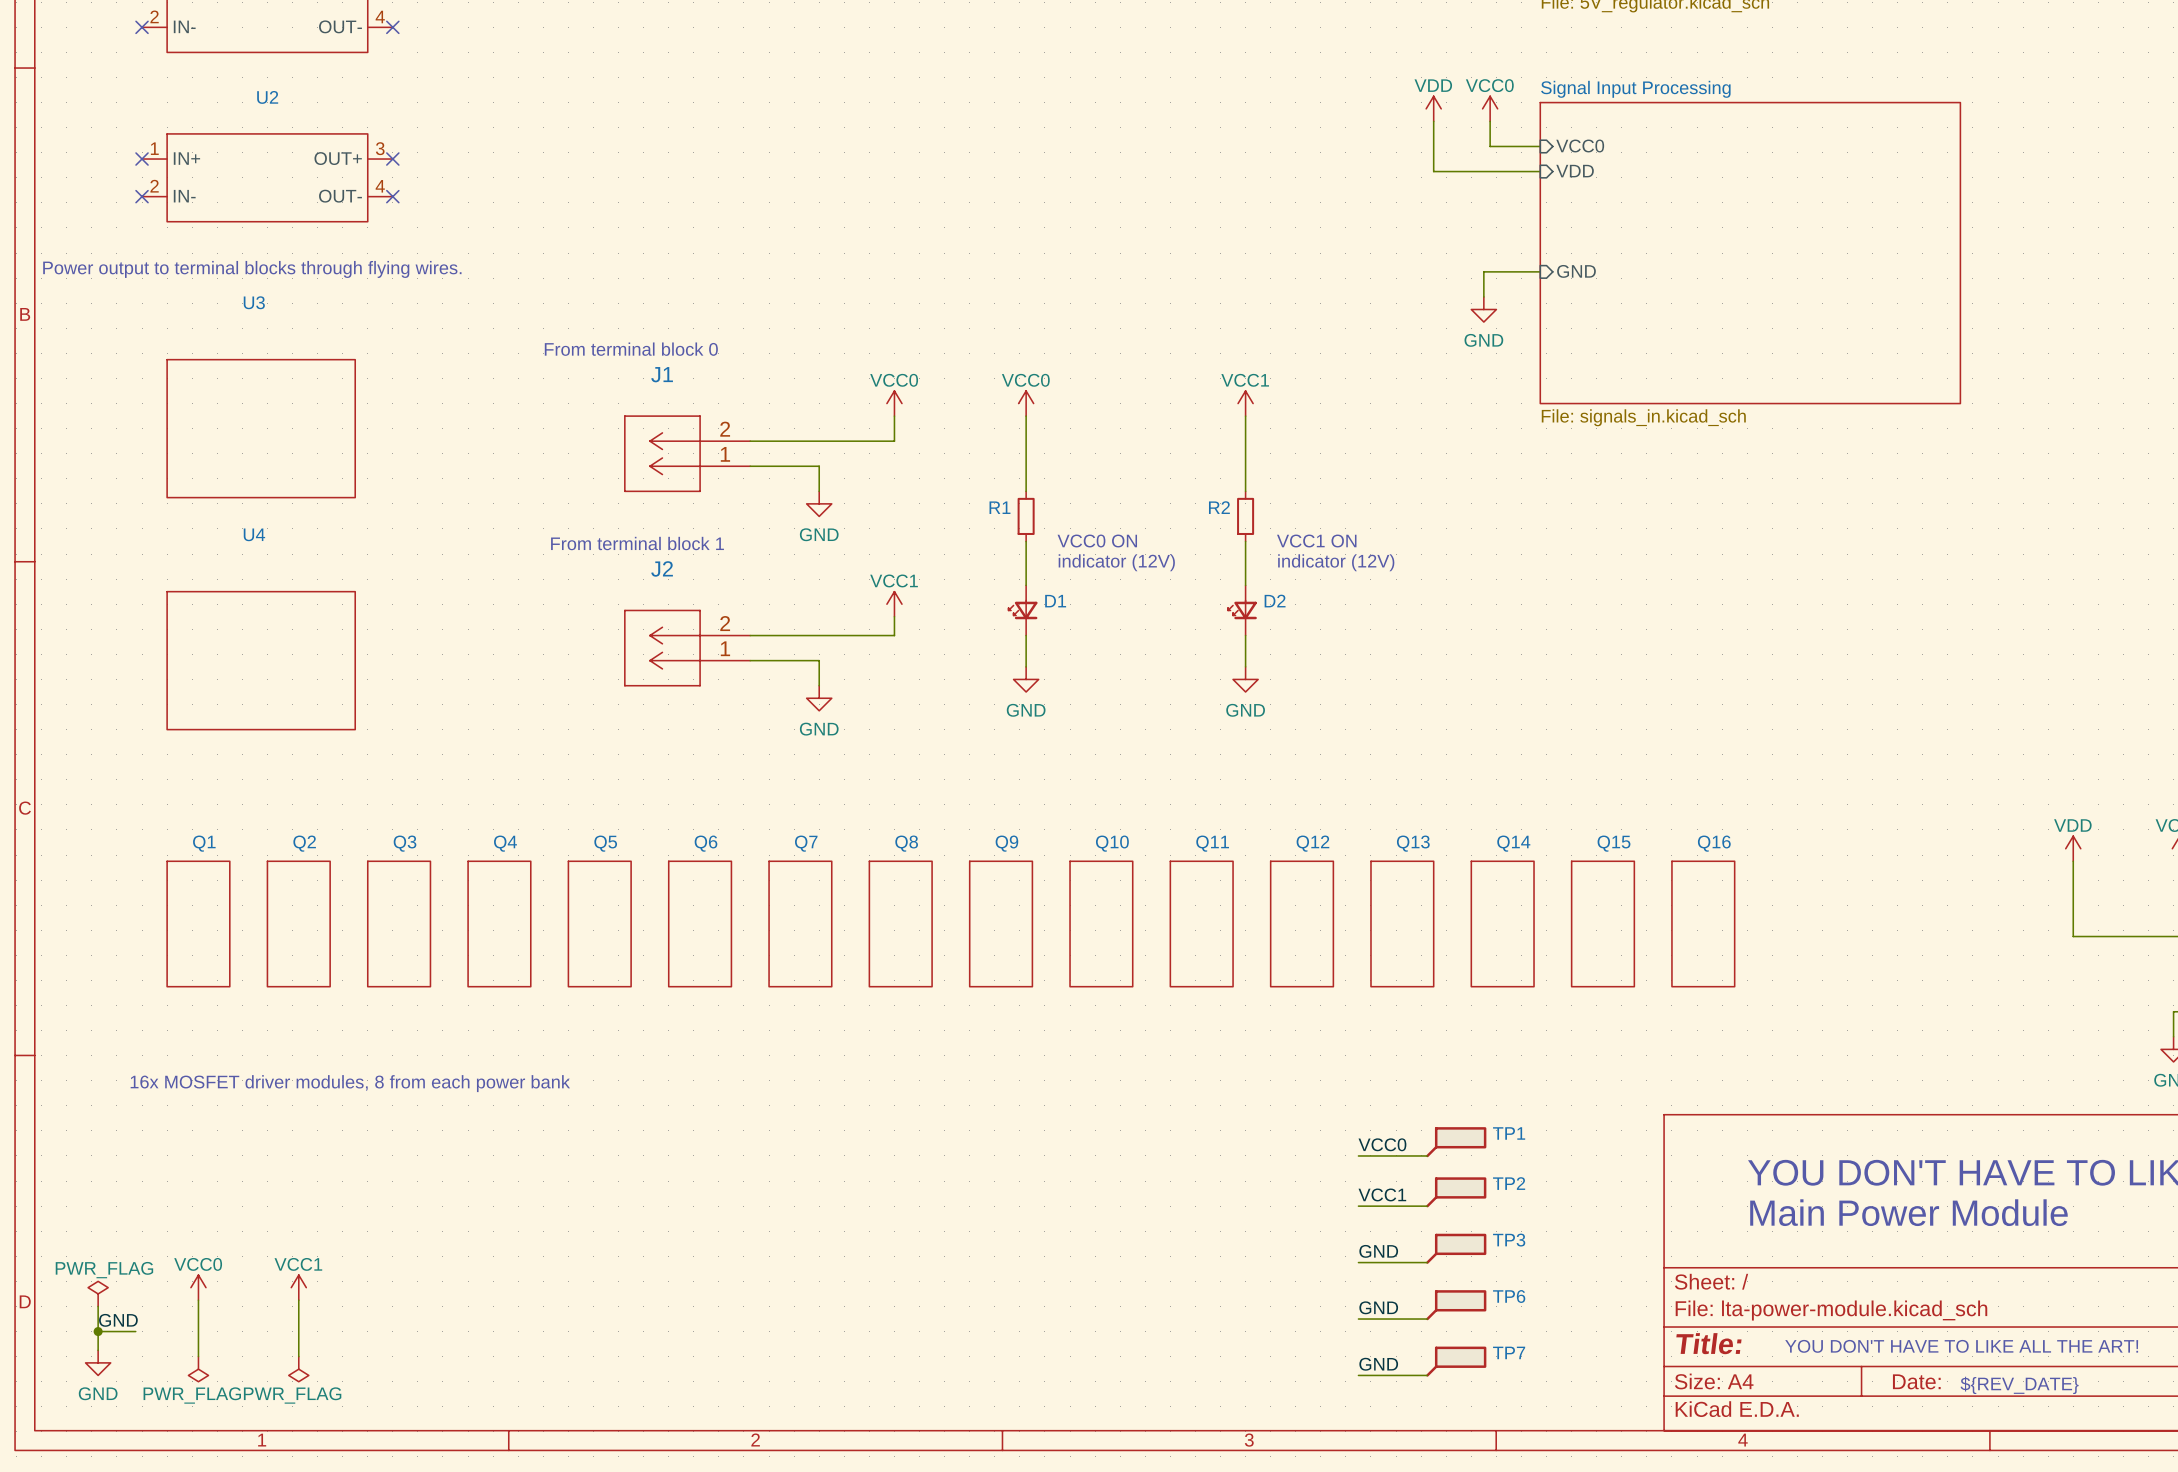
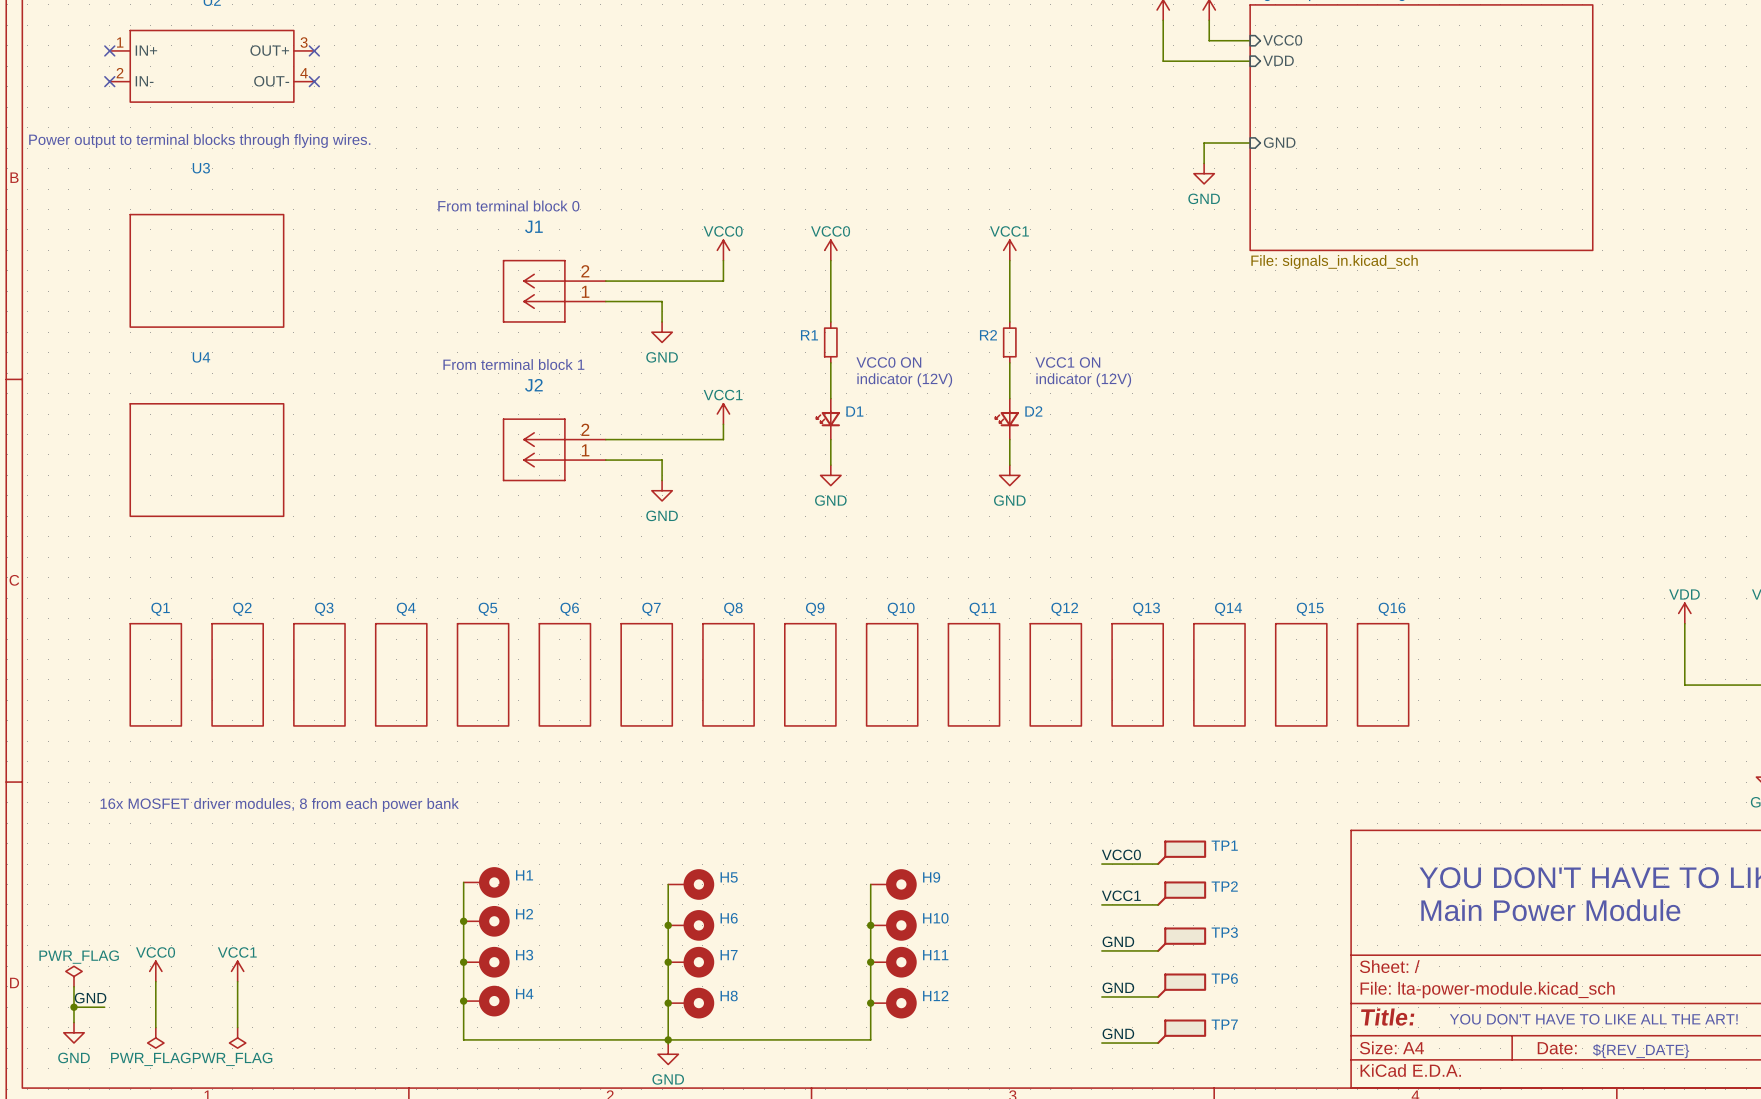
wire: none -> (463, 882) (463, 1039) (870, 1039) (870, 884)
H1: none -> (486, 882)
wire: none -> (668, 884) (668, 1044)
H5: none -> (691, 884)
H9: none -> (893, 884)
junction: none -> (463, 921)
H2: none -> (486, 921)
junction: none -> (668, 925)
H6: none -> (691, 925)
junction: none -> (870, 925)
H10: none -> (893, 925)
junction: none -> (463, 962)
H3: none -> (486, 962)
junction: none -> (668, 962)
H7: none -> (691, 962)
junction: none -> (870, 962)
H11: none -> (893, 962)
junction: none -> (463, 1001)
H4: none -> (486, 1001)
junction: none -> (668, 1003)
H8: none -> (691, 1003)
junction: none -> (870, 1003)
H12: none -> (893, 1003)
junction: none -> (668, 1039)
power symbol: none -> GND (668, 1054)

